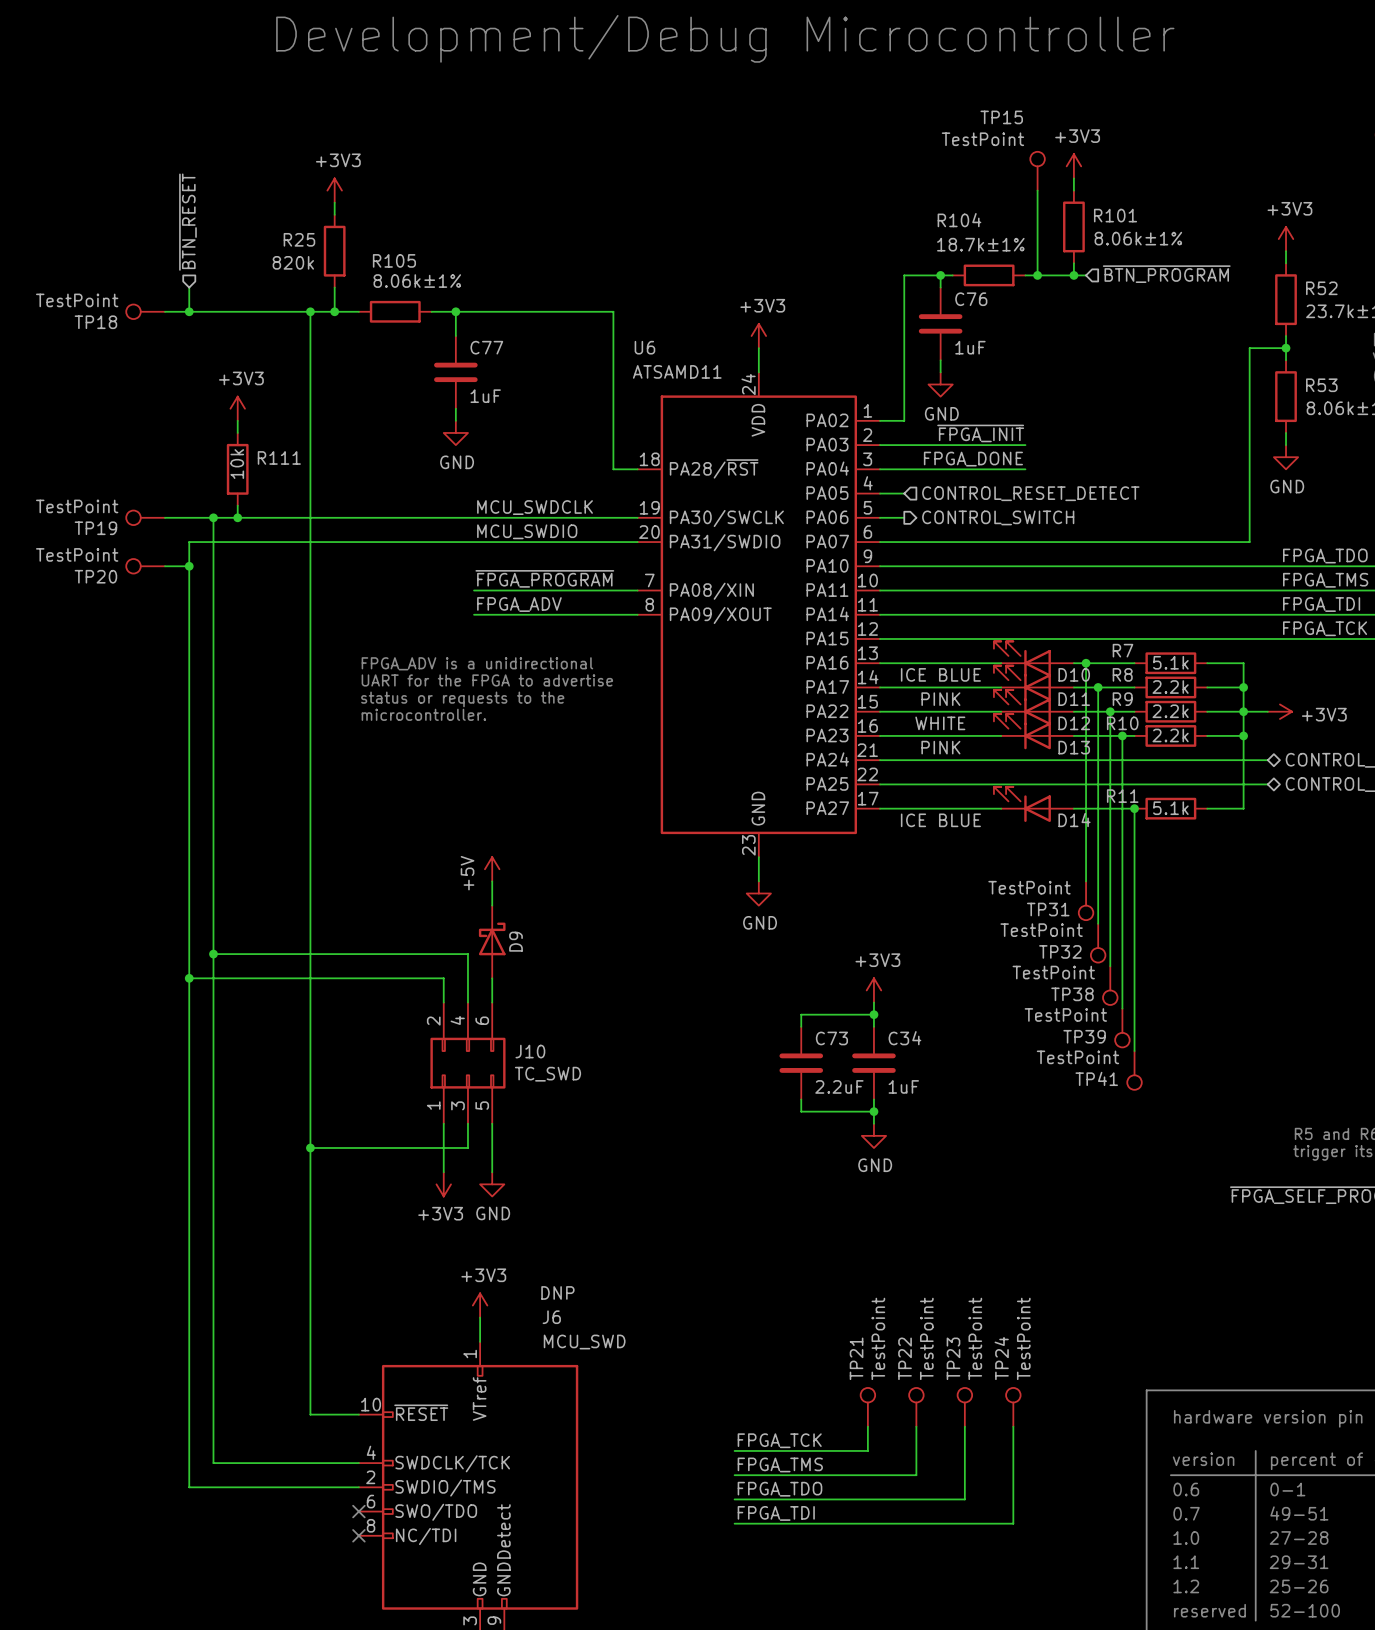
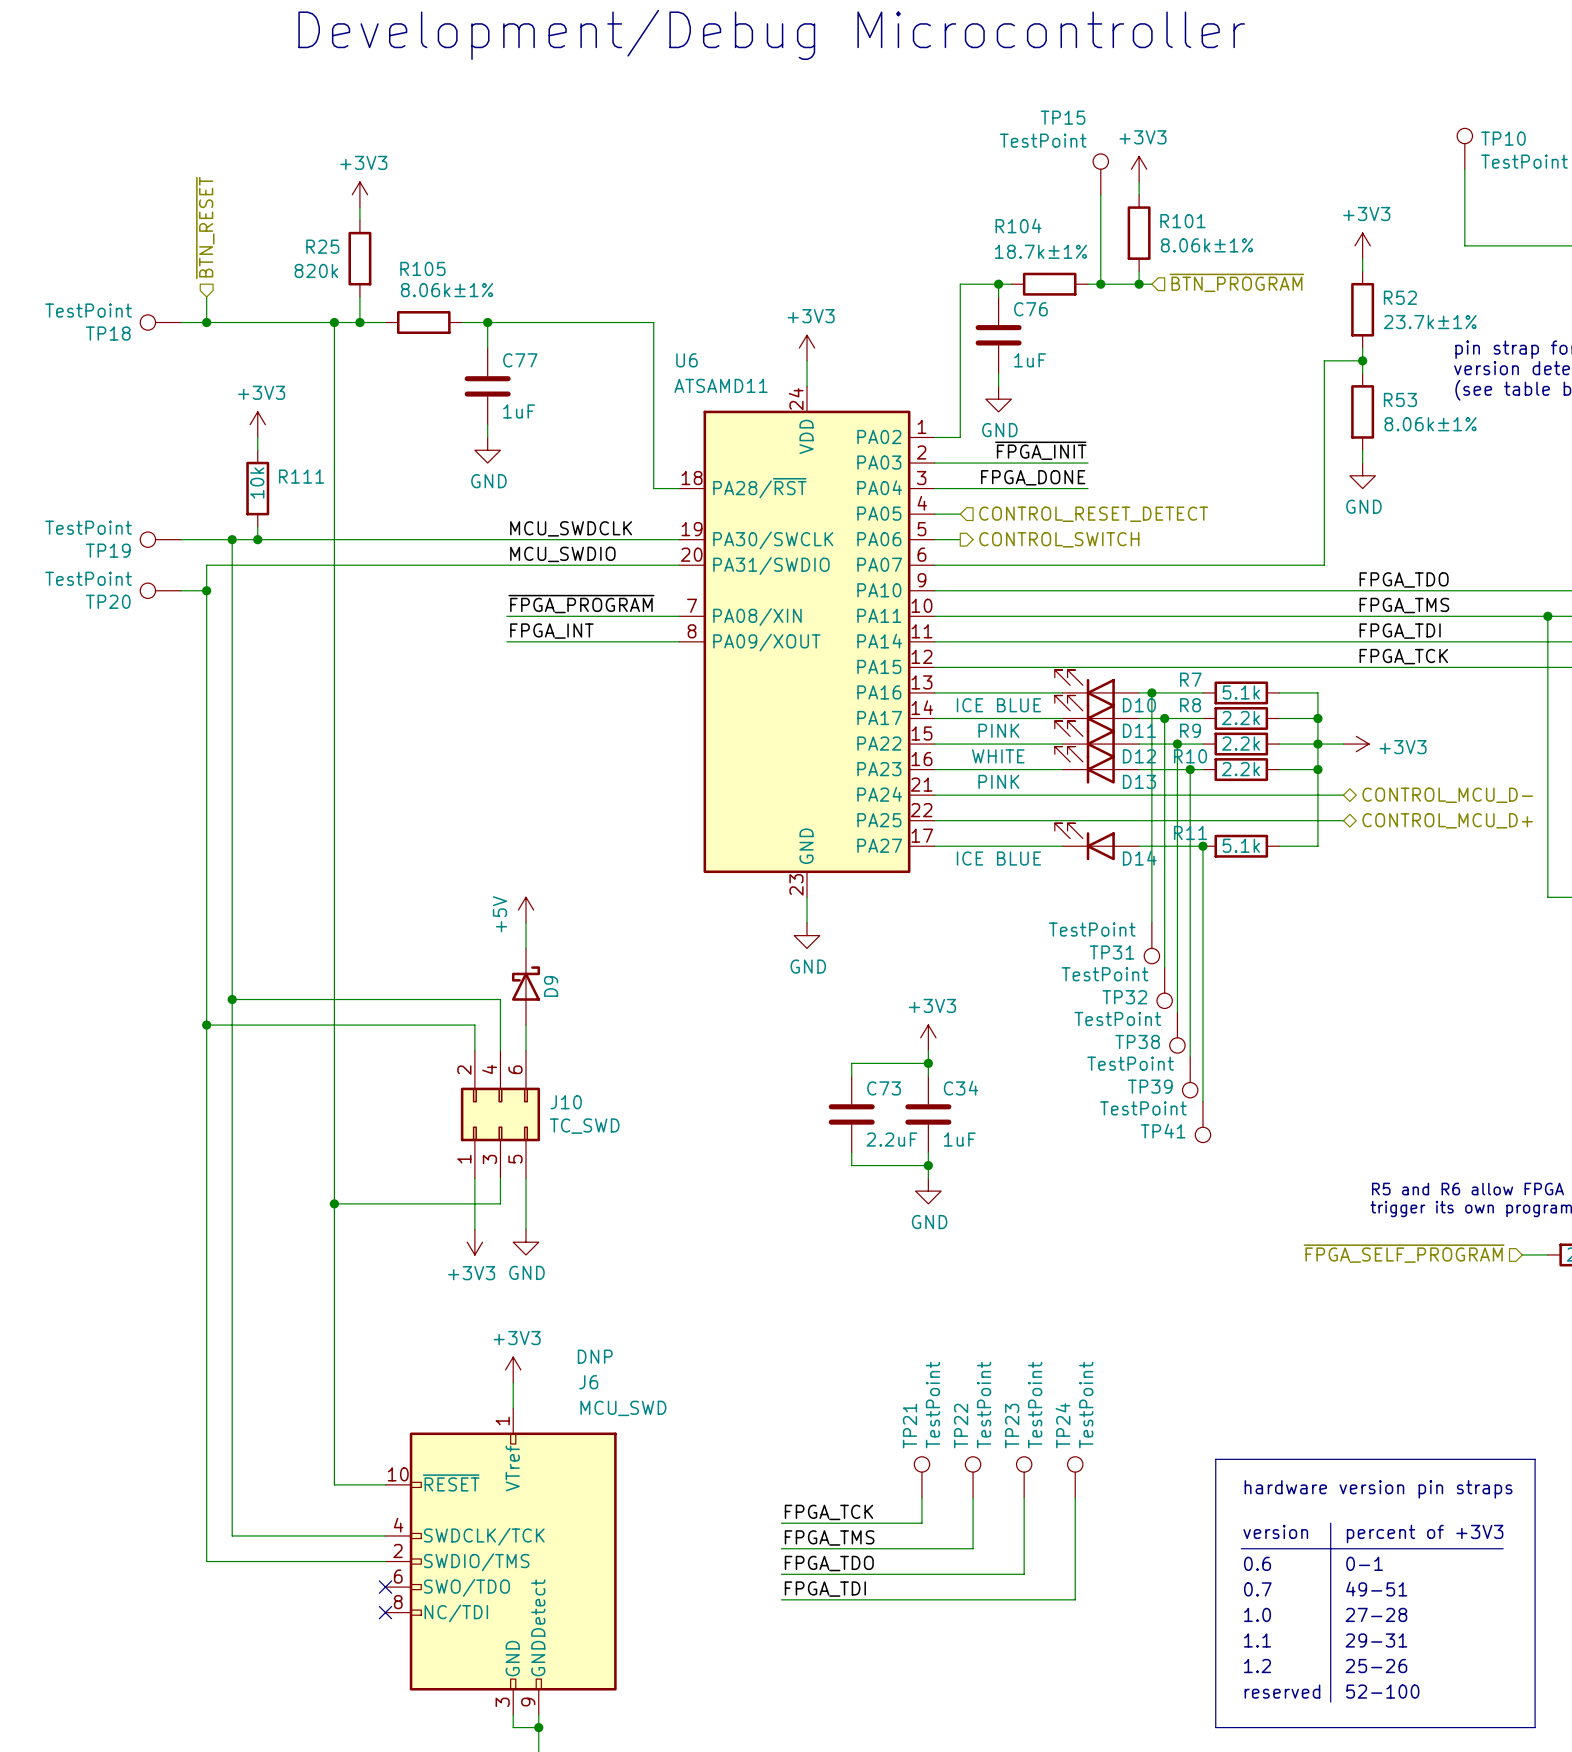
label: FPGA_ADV (519, 604) -> FPGA_INT (551, 631)
text: FPGA_ADV is a unidirectional (477, 663) -> none
text: UART for the FPGA to advertise (487, 680) -> none
text: status or requests to the (462, 699) -> none
text: microcontroller. (423, 714) -> none

